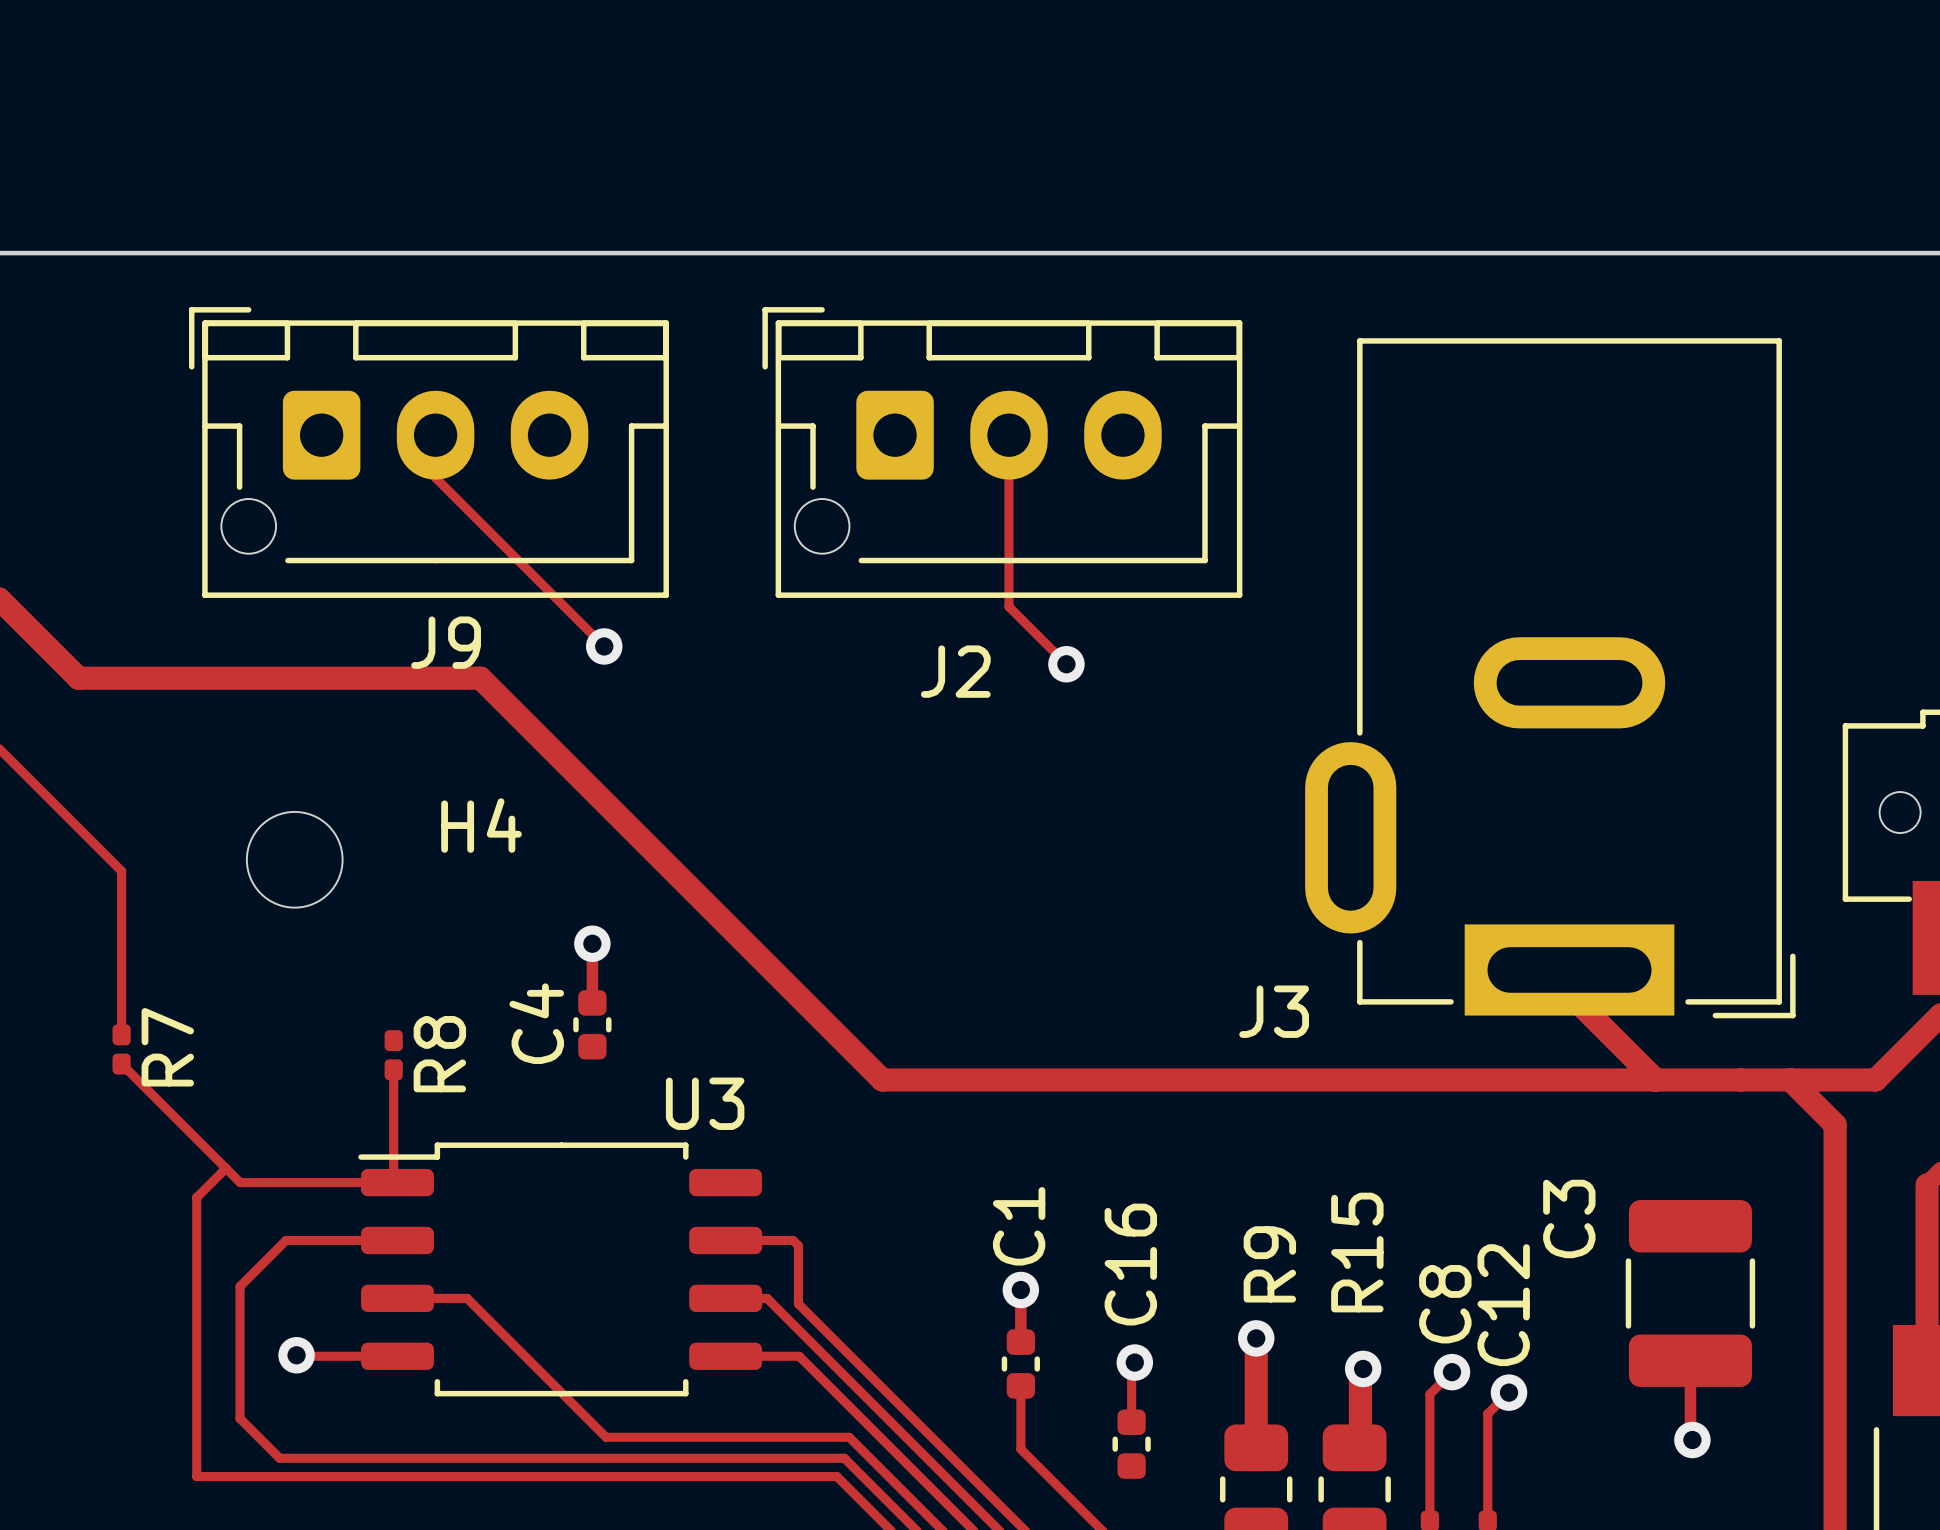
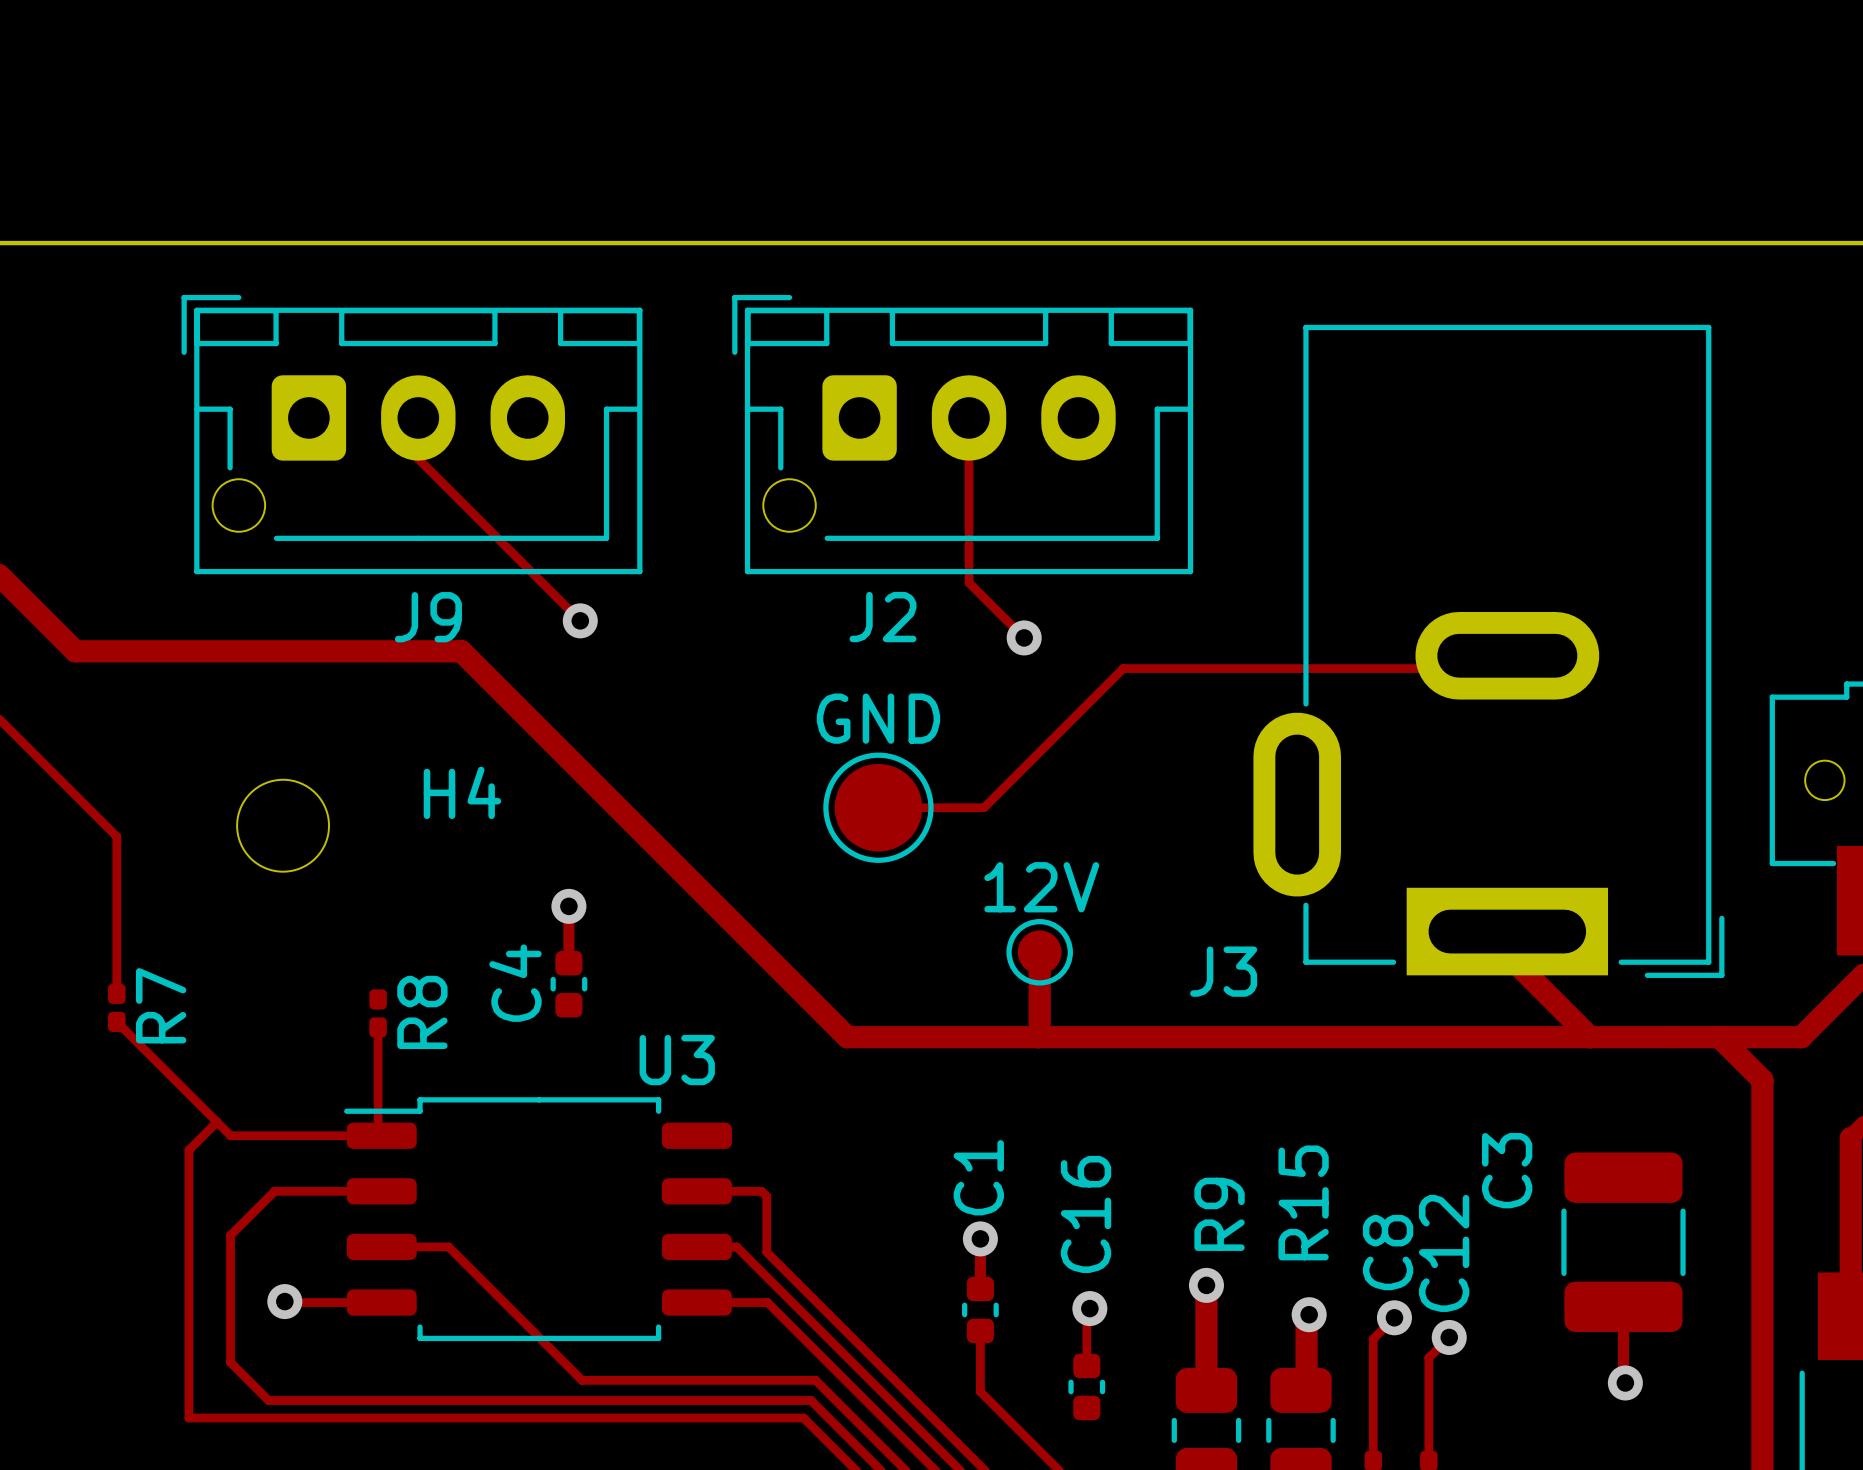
J2 name position: J2 (955, 671) -> J2 (882, 617)
track: none -> (1507, 655) (1494, 668) (1123, 668) (984, 807) (878, 807)
GND: none -> (878, 807)
track: none -> (1039, 952) (1038, 1037)
12V: none -> (1039, 952)

